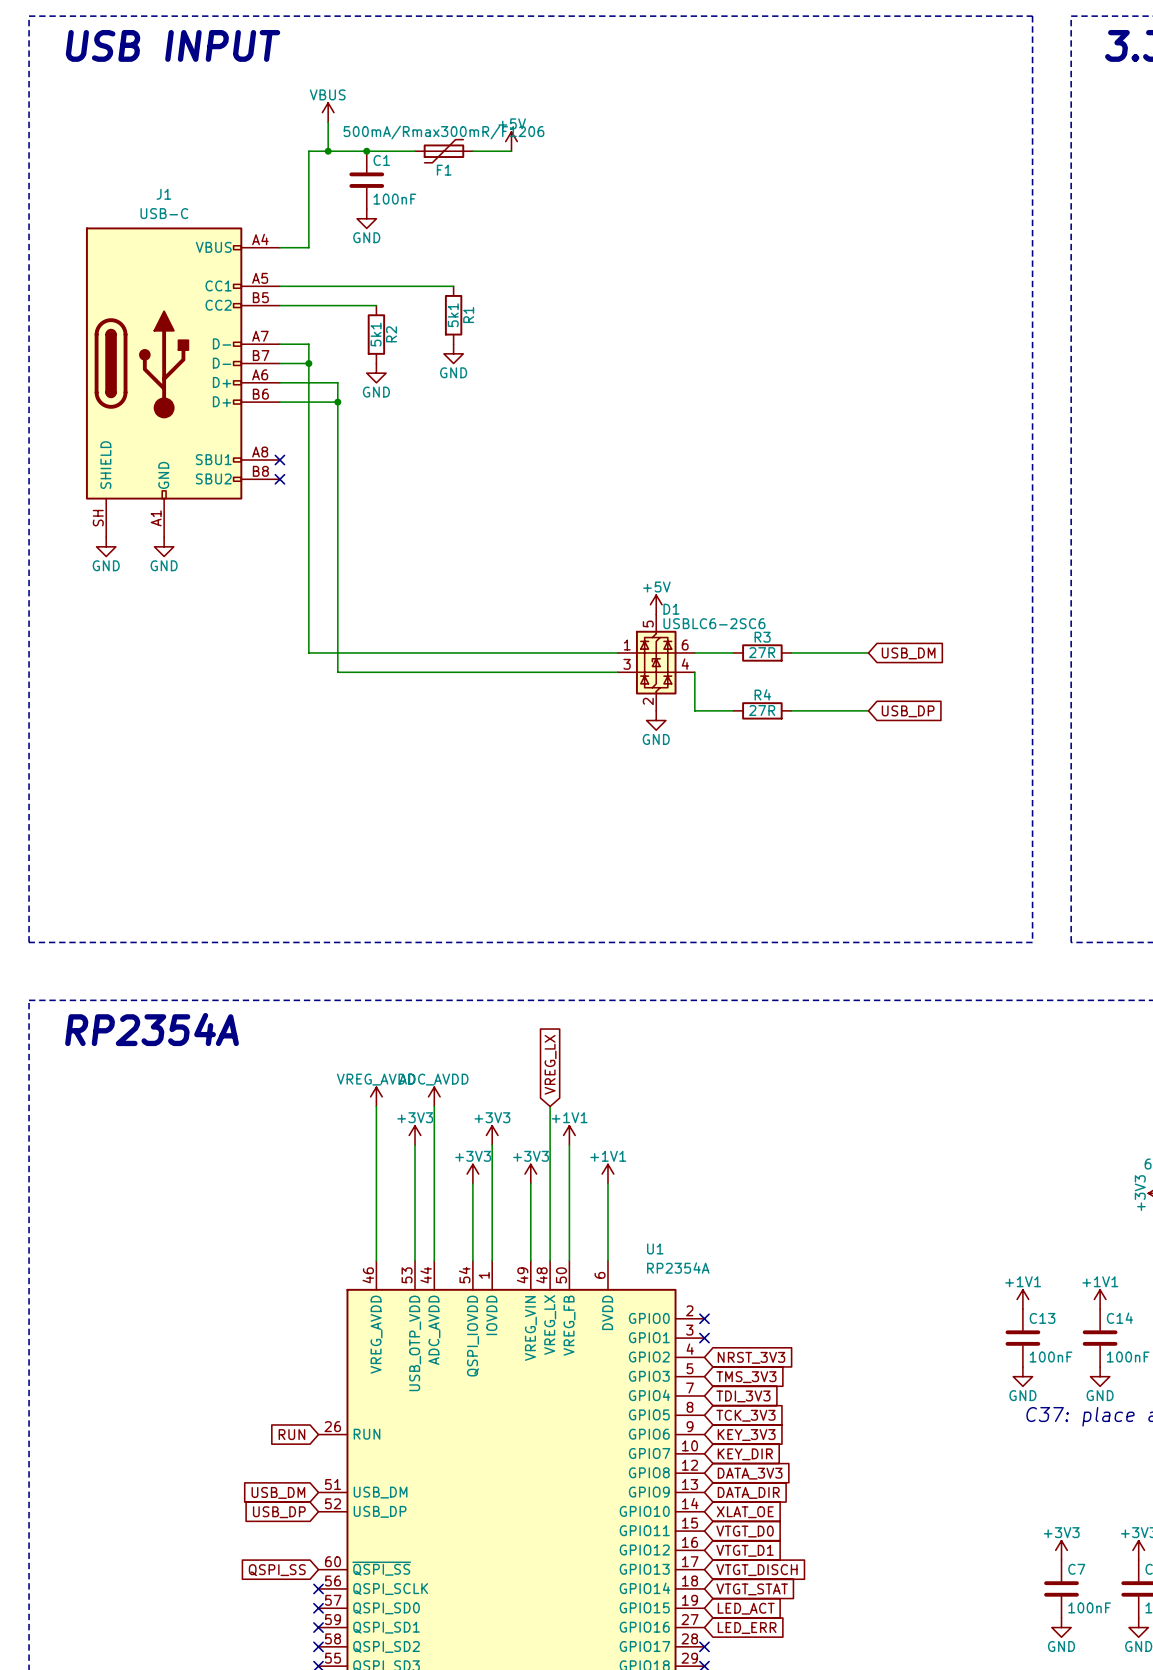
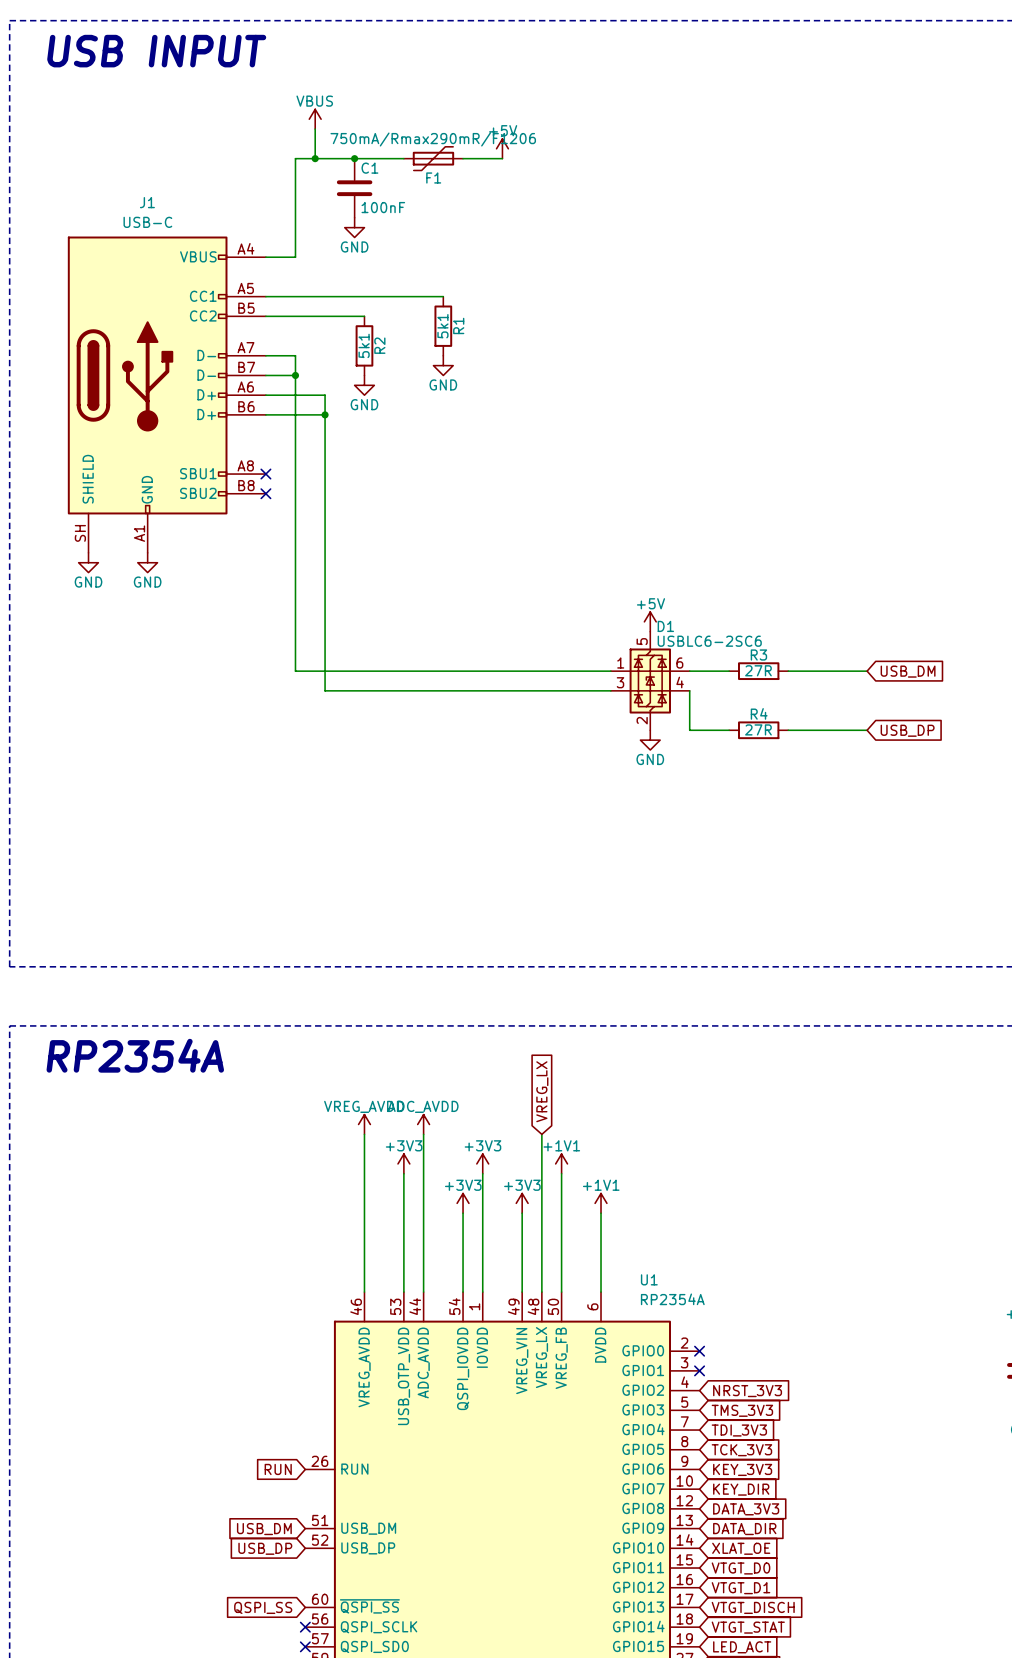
F1 value: 500mA/Rmax300mR/F1206 (443, 132) -> 750mA/Rmax290mR/F1206 (433, 139)

